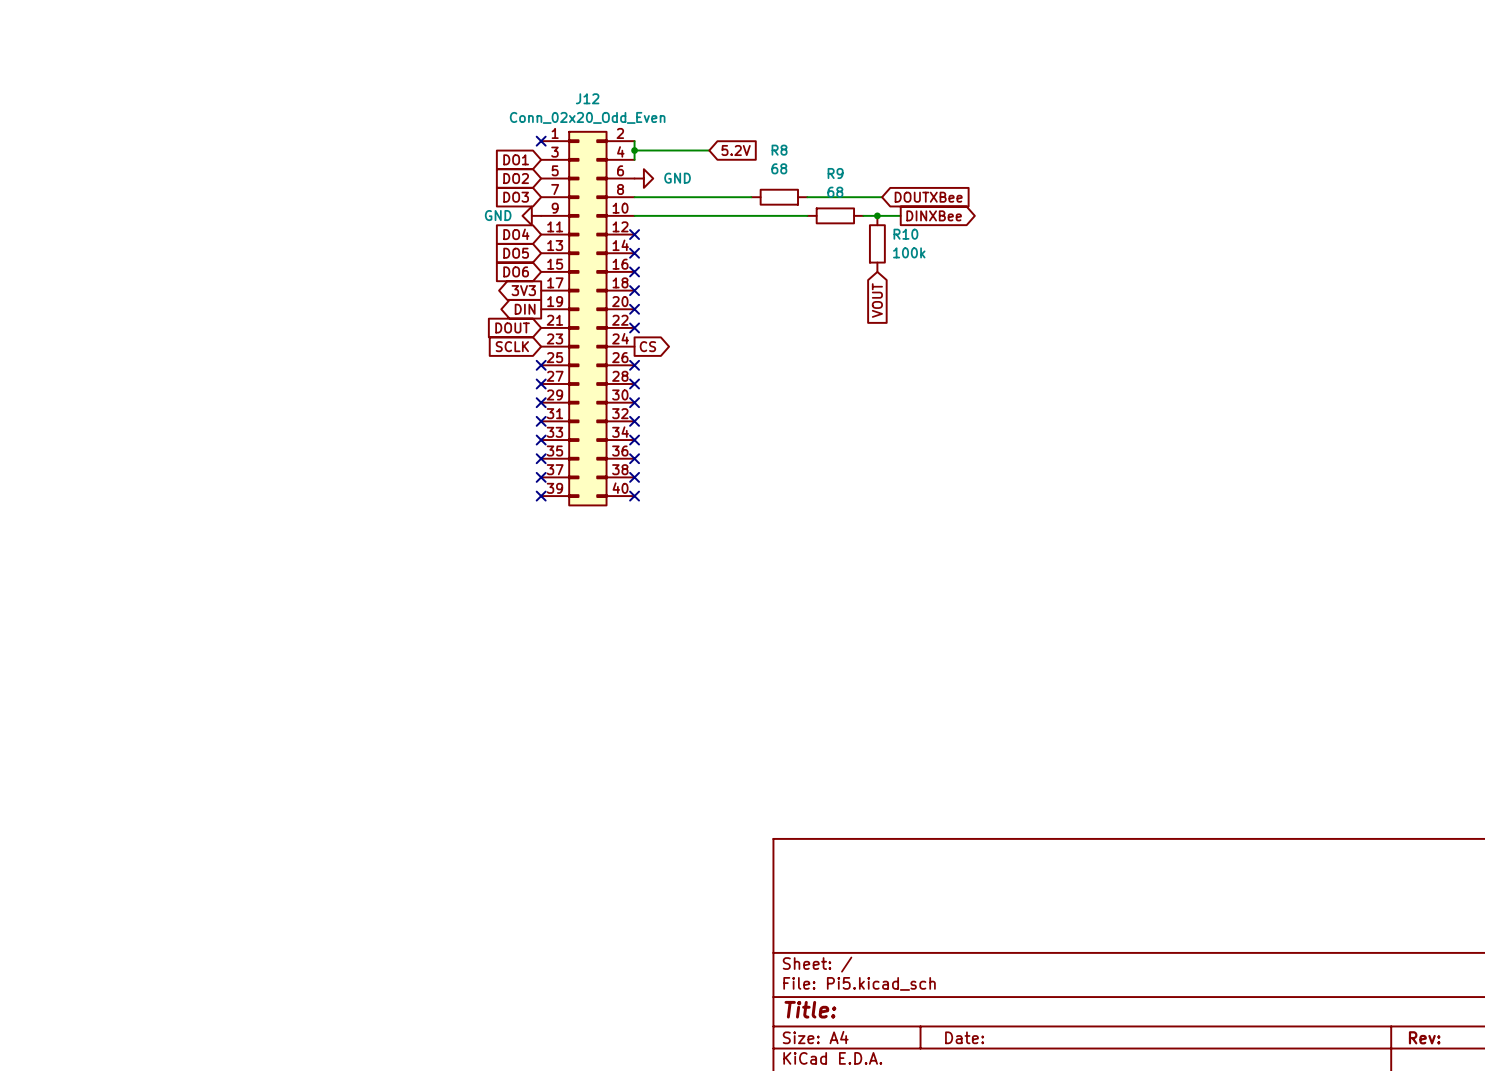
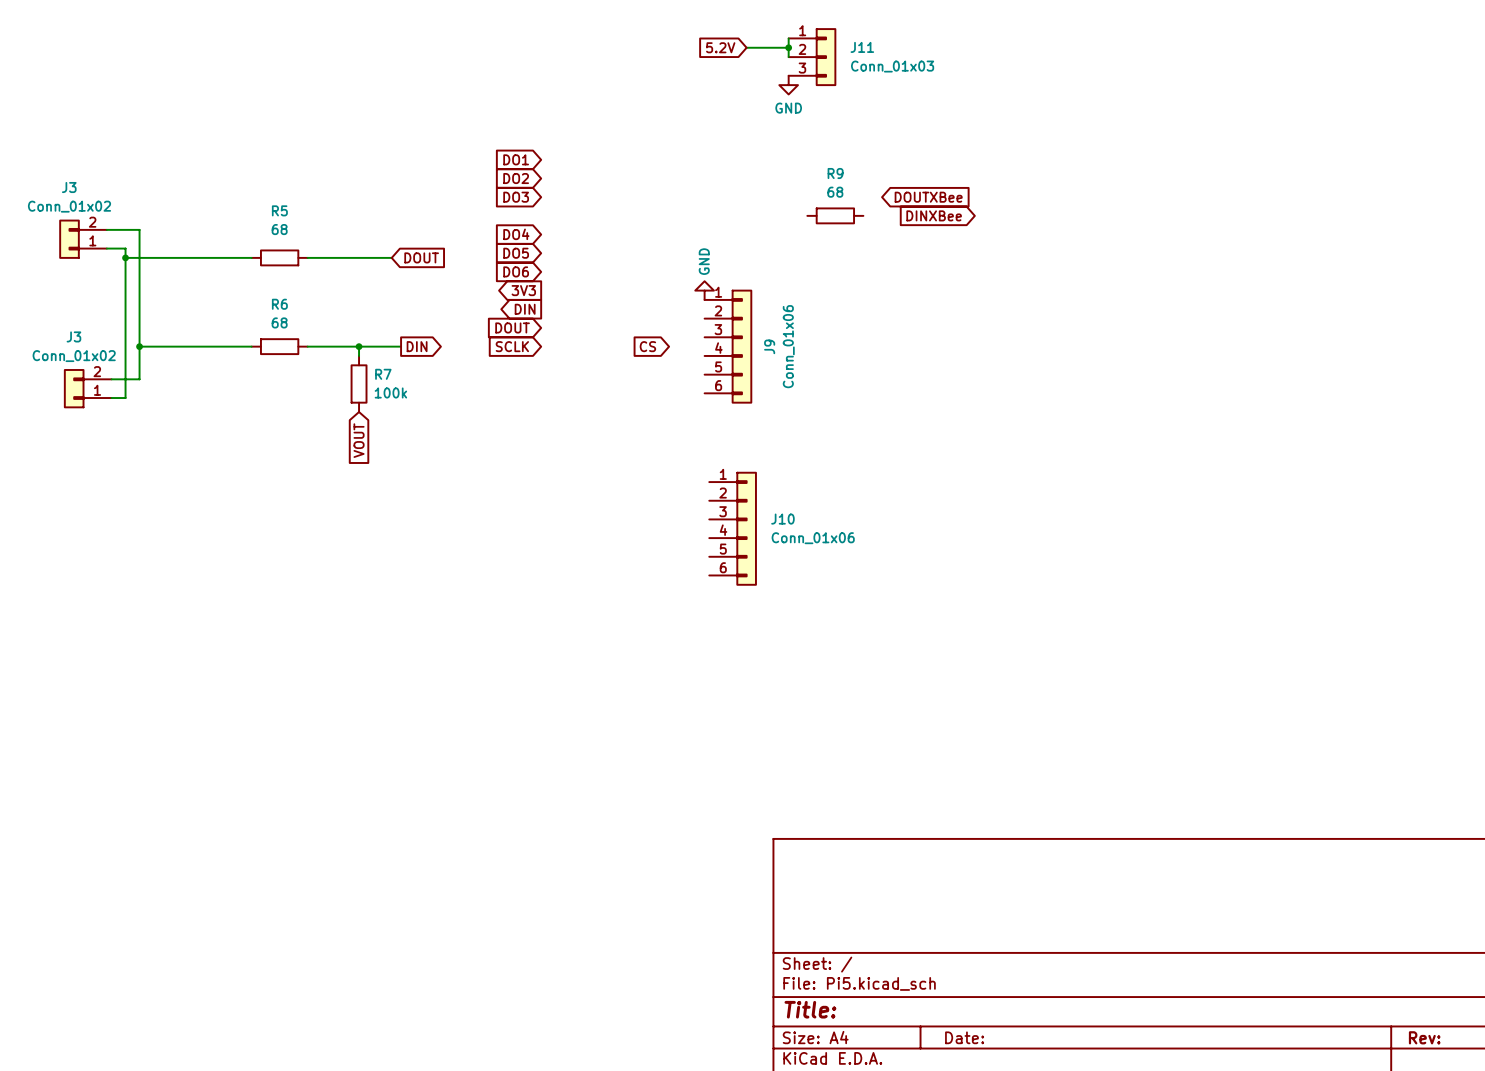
wire: none -> (788, 38) (788, 57)
wire: none -> (746, 47) (788, 47)
junction: none -> (788, 47)
J11: none -> Conn_01x03 (812, 57)
power symbol: none -> GND (788, 85)
no-connect mark: (541, 141) -> none
wire: (634, 141) (634, 159) -> none
wire: (634, 150) (709, 150) -> none
junction: (634, 150) -> none
global label rotation: 0° (736, 150) -> 180° (720, 47)
global label position: 5.2V (736, 150) -> 5.2V (720, 47)
power symbol: GND (643, 178) -> none
wire: (634, 197) (751, 197) -> none
R8: 68 (779, 197) -> none
wire: (807, 197) (882, 197) -> none
power symbol: GND (531, 215) -> none
wire: (634, 215) (807, 215) -> none
wire: (863, 215) (900, 215) -> none
junction: (877, 215) -> none
wire: none -> (106, 229) (139, 229) (139, 379) (111, 379)
no-connect mark: (634, 234) -> none
J3: none -> Conn_01x02 (83, 239)
R10: 100k (877, 243) -> none
wire: none -> (106, 248) (125, 248) (125, 398) (111, 398)
no-connect mark: (634, 253) -> none
wire: none -> (125, 257) (251, 257)
junction: none -> (125, 257)
R5: none -> 68 (279, 257)
wire: none -> (307, 257) (391, 257)
global label: none -> DOUT (421, 257)
no-connect mark: (634, 271) -> none
no-connect mark: (634, 290) -> none
power symbol: none -> GND (704, 290)
global label: VOUT (877, 300) -> none
no-connect mark: (634, 309) -> none
J12: Conn_02x20_Odd_Even (587, 318) -> none
no-connect mark: (634, 327) -> none
wire: none -> (139, 346) (251, 346)
junction: none -> (139, 346)
R6: none -> 68 (279, 346)
wire: none -> (307, 346) (401, 346)
wire: none -> (359, 346) (359, 355)
junction: none -> (359, 346)
global label: none -> DIN (417, 346)
J9: none -> Conn_01x06 (728, 346)
no-connect mark: (541, 365) -> none
no-connect mark: (634, 365) -> none
R7: none -> 100k (359, 383)
no-connect mark: (541, 383) -> none
no-connect mark: (634, 383) -> none
J3: none -> Conn_01x02 (87, 388)
no-connect mark: (541, 402) -> none
no-connect mark: (634, 402) -> none
no-connect mark: (541, 421) -> none
no-connect mark: (634, 421) -> none
global label: none -> VOUT (359, 440)
no-connect mark: (541, 440) -> none
no-connect mark: (634, 440) -> none
no-connect mark: (541, 458) -> none
no-connect mark: (634, 458) -> none
no-connect mark: (541, 477) -> none
no-connect mark: (634, 477) -> none
no-connect mark: (541, 496) -> none
no-connect mark: (634, 496) -> none
J10: none -> Conn_01x06 (733, 528)

